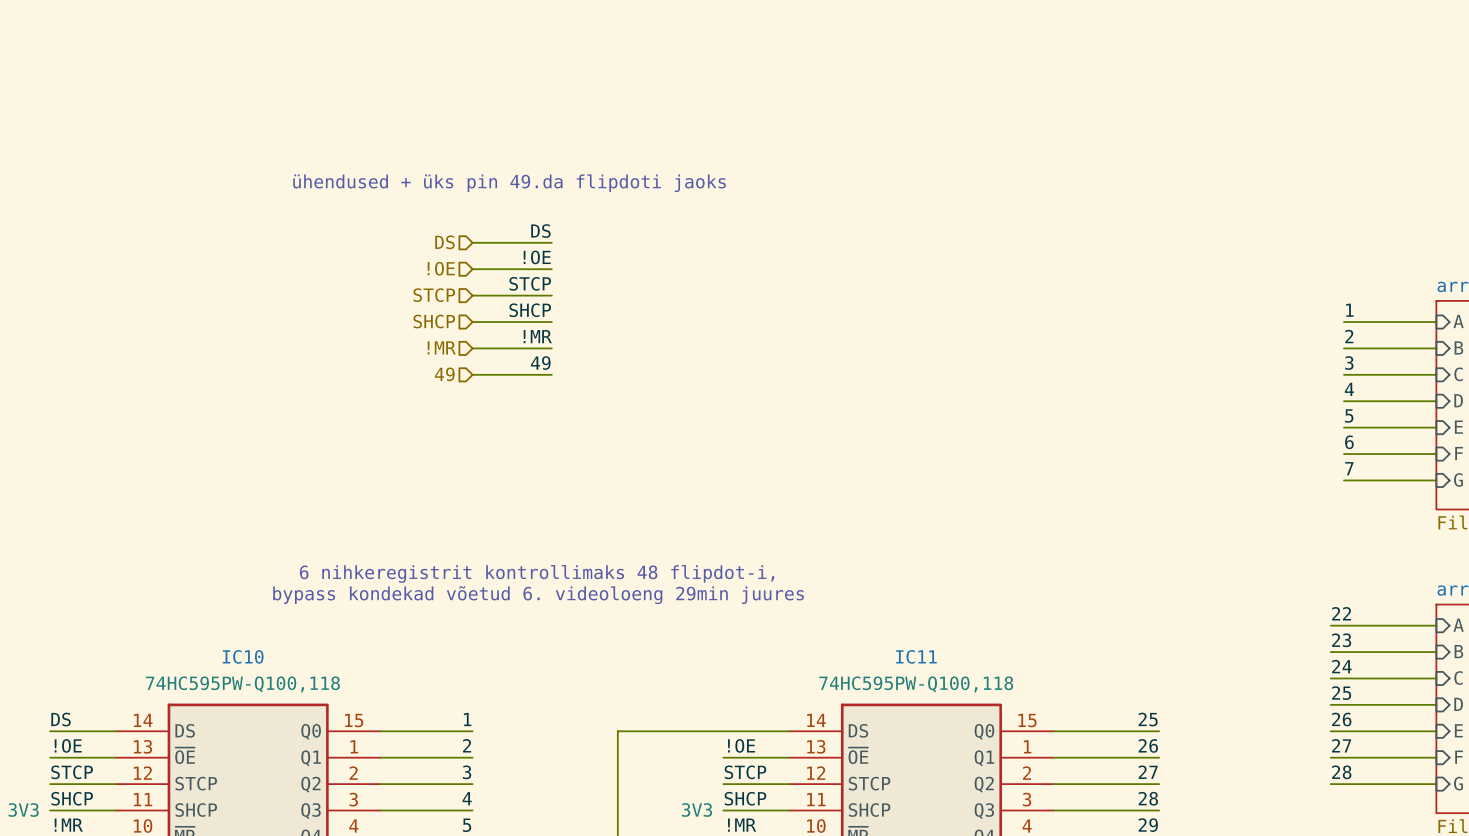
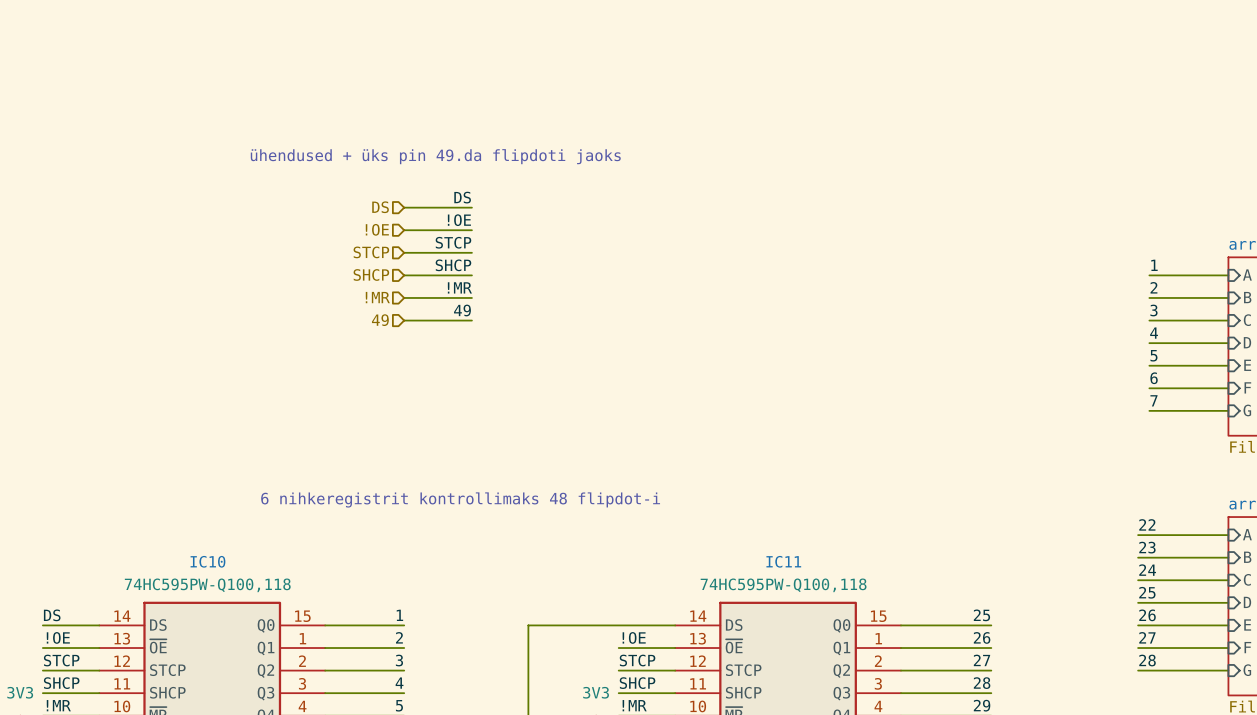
text: 6 nihkeregistrit kontrollimaks 48 flipdot-i, (537, 573) -> 6 nihkeregistrit kontrollimaks 48 flipdot-i (460, 499)
text: bypass kondekad võetud 6. videoloeng 29min juures (538, 595) -> none

